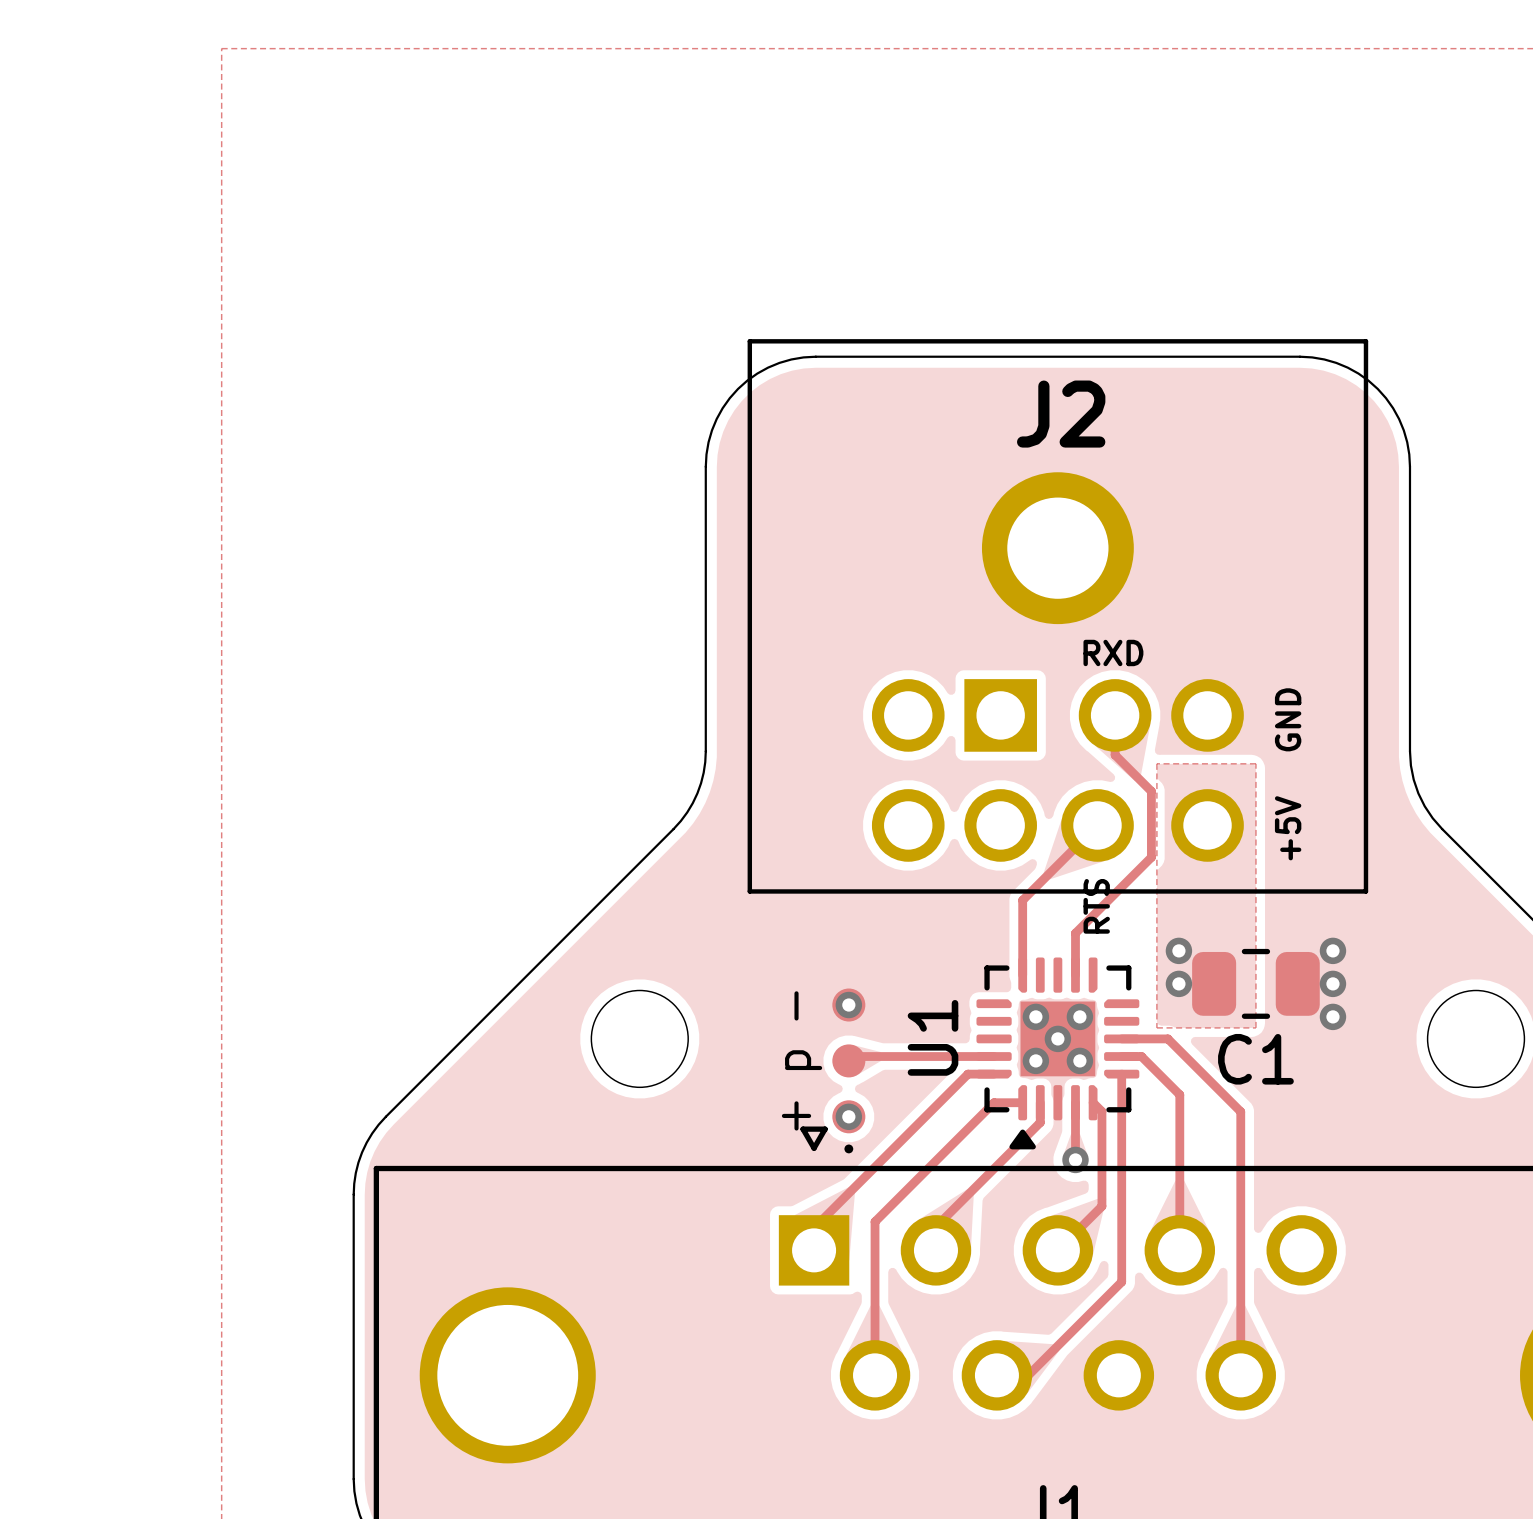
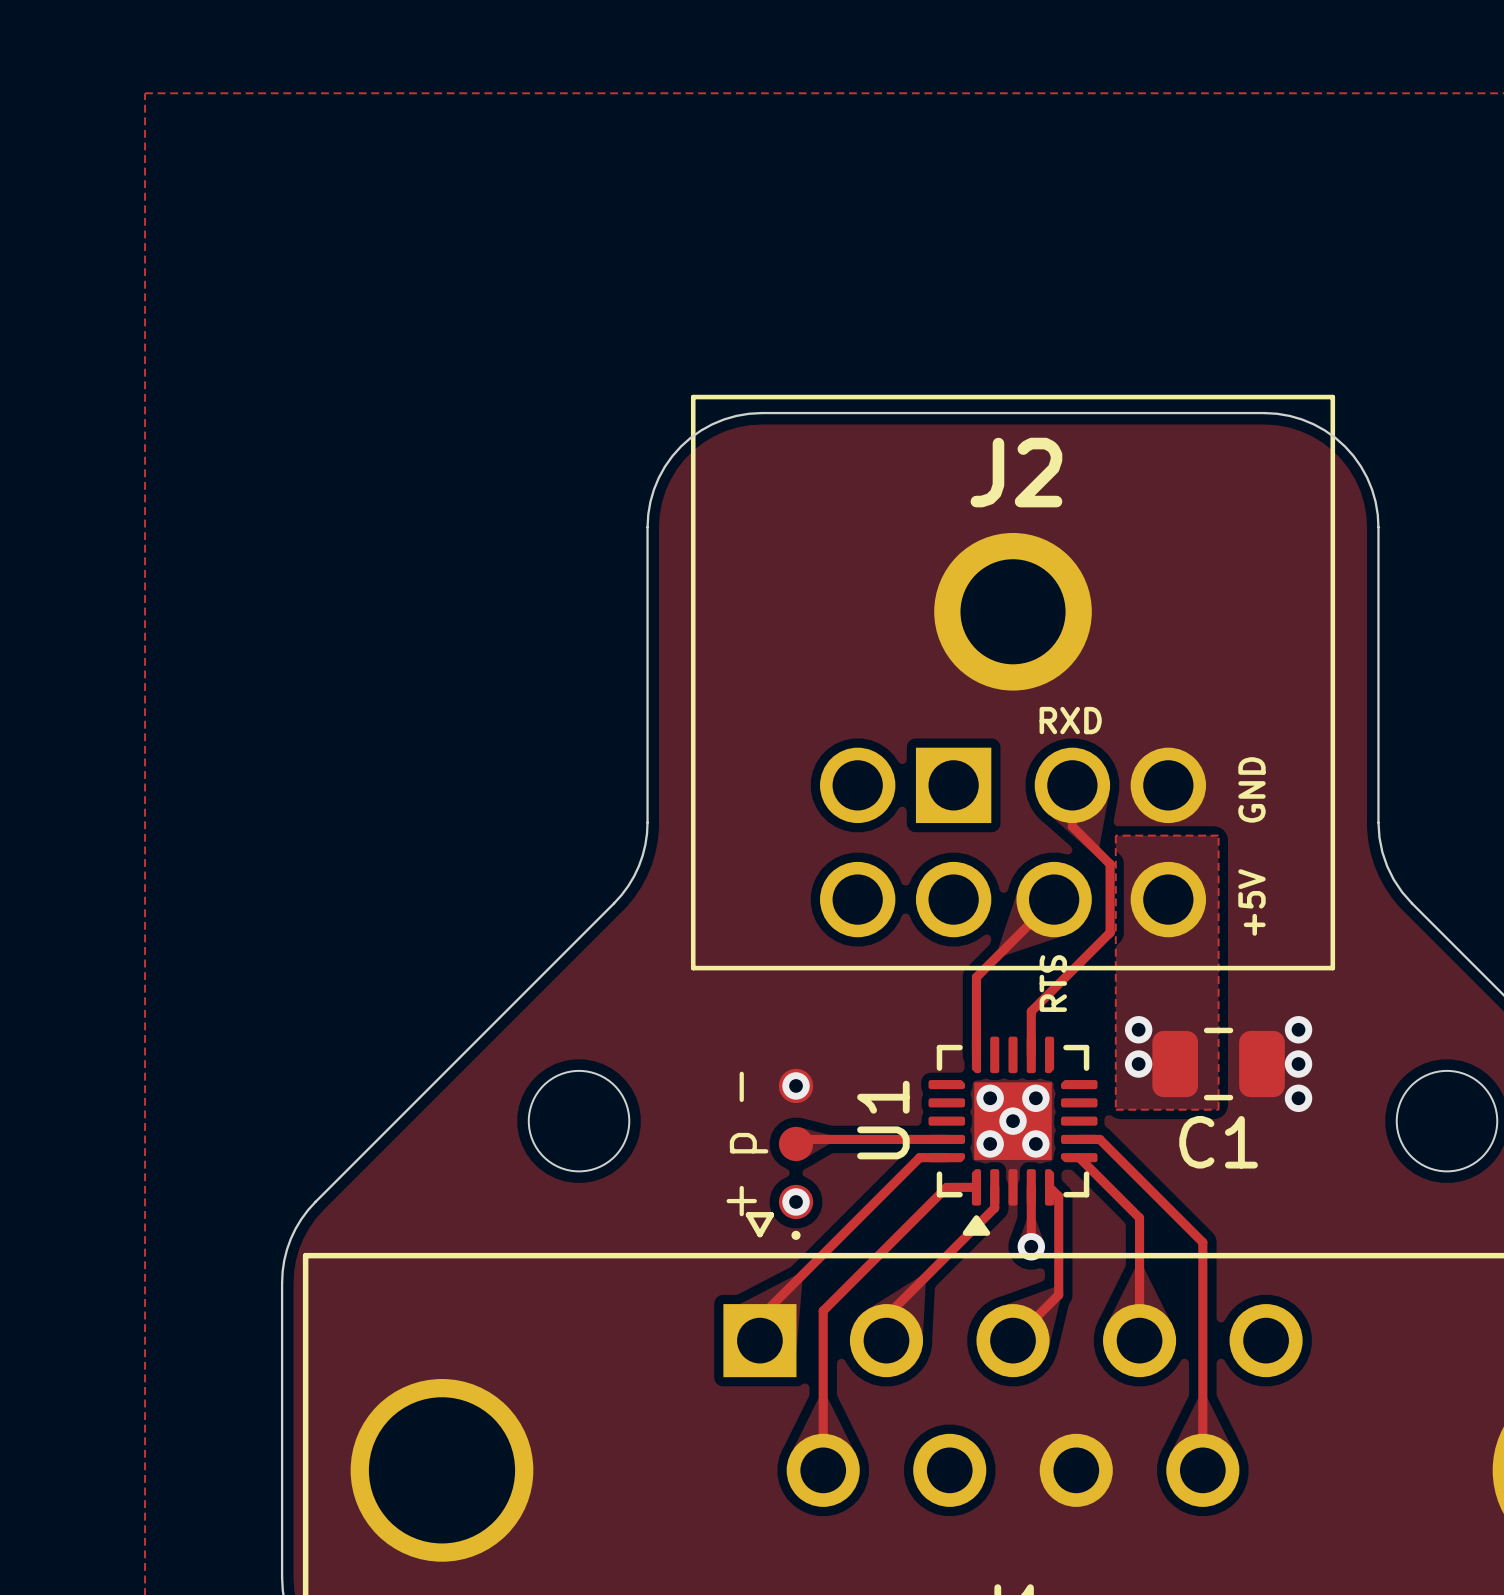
track: (1121, 1038) (1167, 1038) (1240, 1111) (1240, 1155) -> (1139, 1179) (1202, 1242)
track: (1121, 1074) (1121, 1281) (1028, 1375) (996, 1375) -> none
track: (1179, 1094) (1179, 1132) -> (1079, 1157) (1139, 1217)

